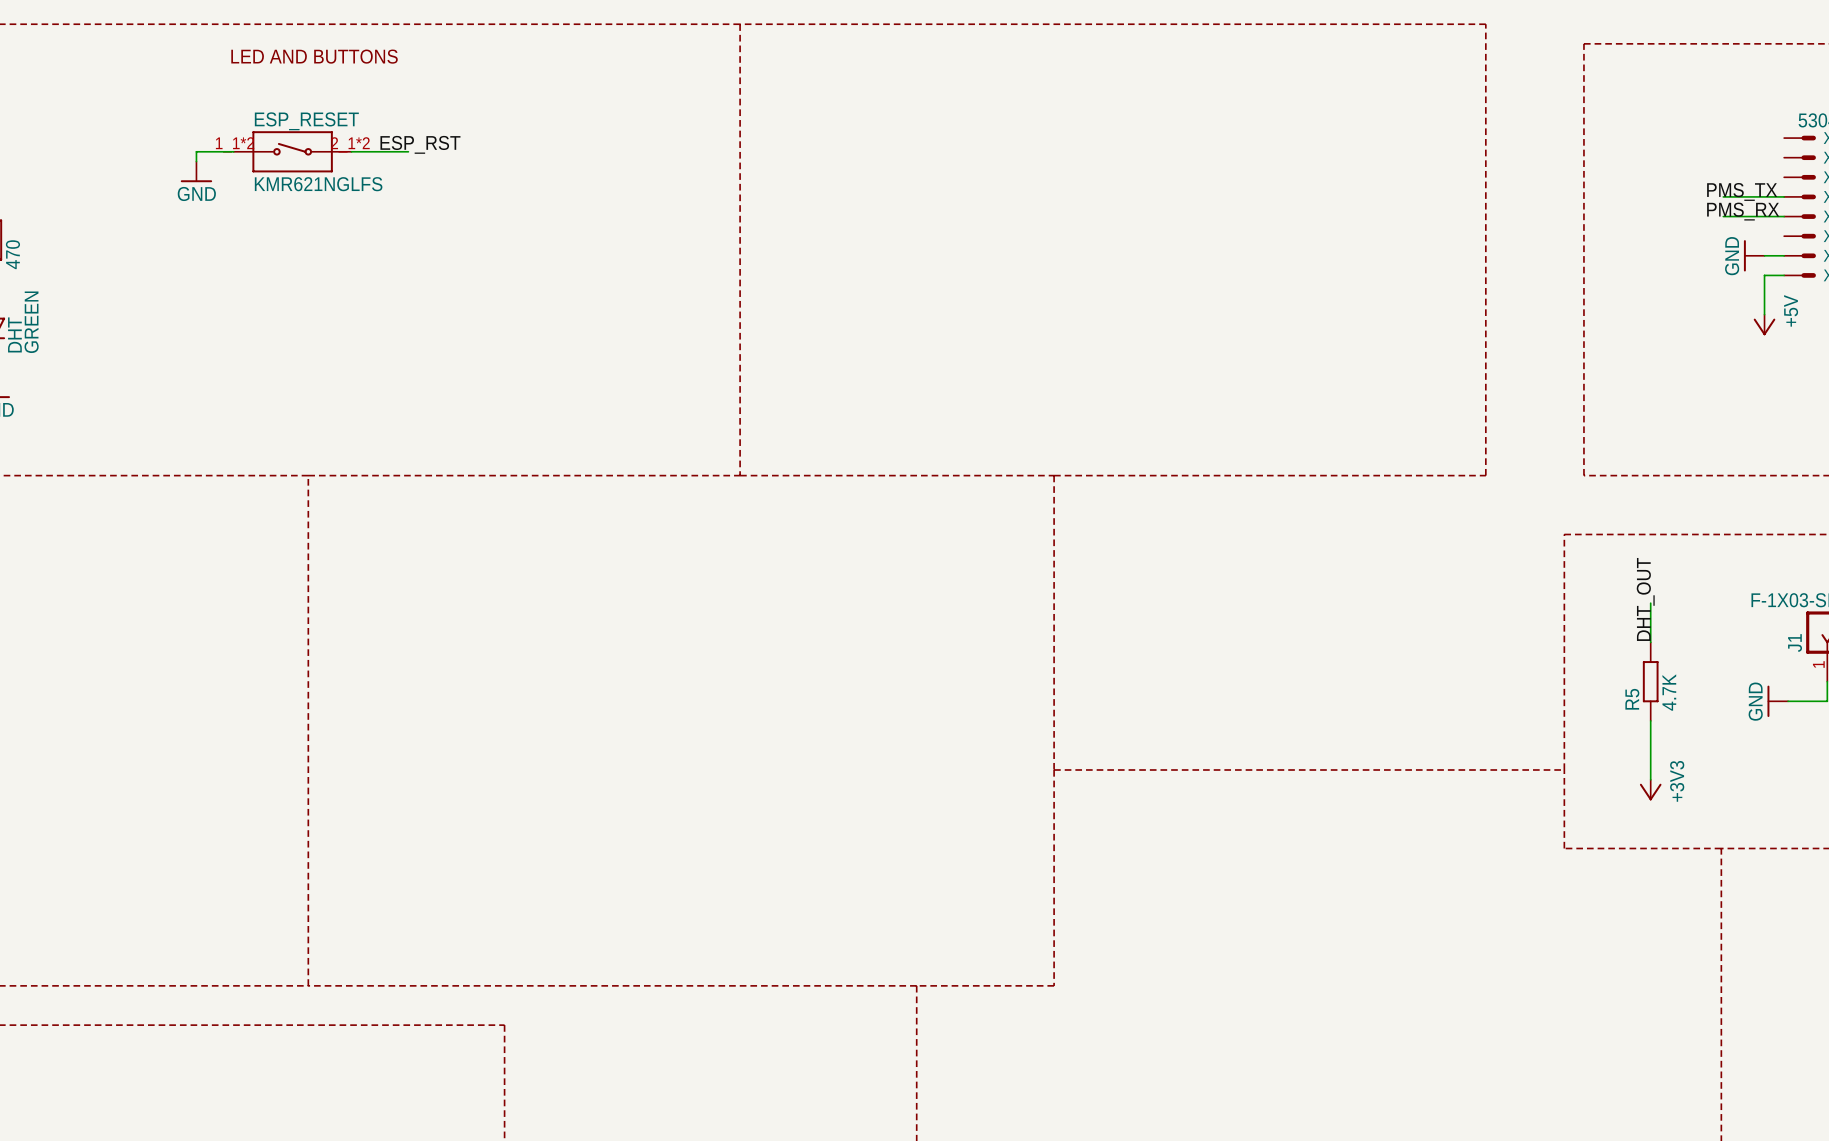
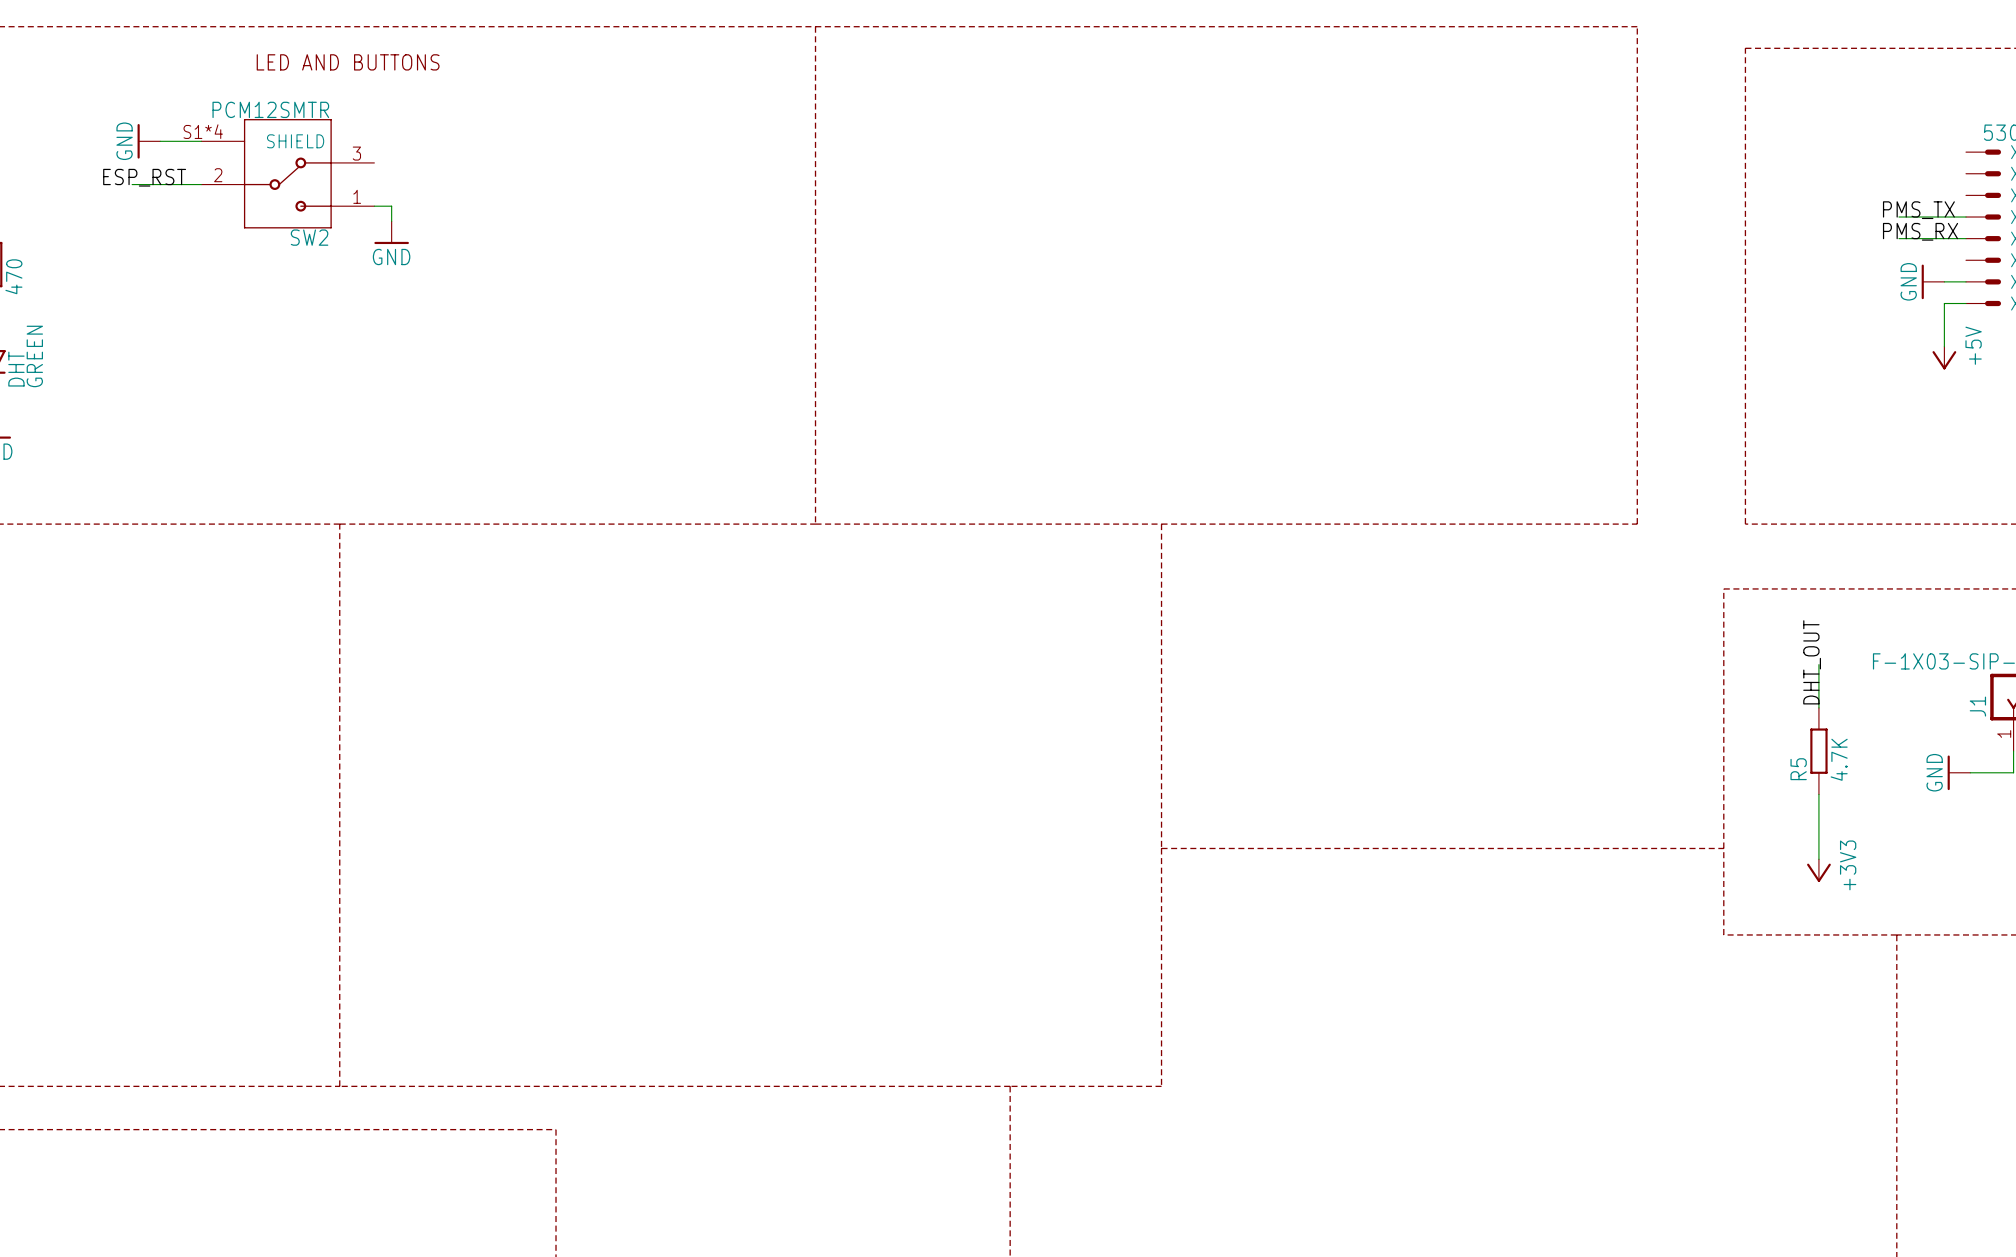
wire: none -> (160, 141) (201, 141)
label: ESP_RST (420, 144) -> none
wire: (233, 151) (196, 151) (196, 161) -> none
ESP_RESET: KMR621NGLFS (292, 151) -> none
wire: (351, 151) (408, 151) -> none
SW2: none -> PCM12SMTR (287, 173)
label: none -> ESP_RST (144, 177)
wire: none -> (132, 184) (201, 184)
power symbol position: GND (196, 171) -> GND (148, 141)
power symbol rotation: 0° (196, 181) -> 90° clockwise (138, 141)
wire: none -> (374, 206) (391, 206) (391, 221)
power symbol: none -> GND (391, 232)

